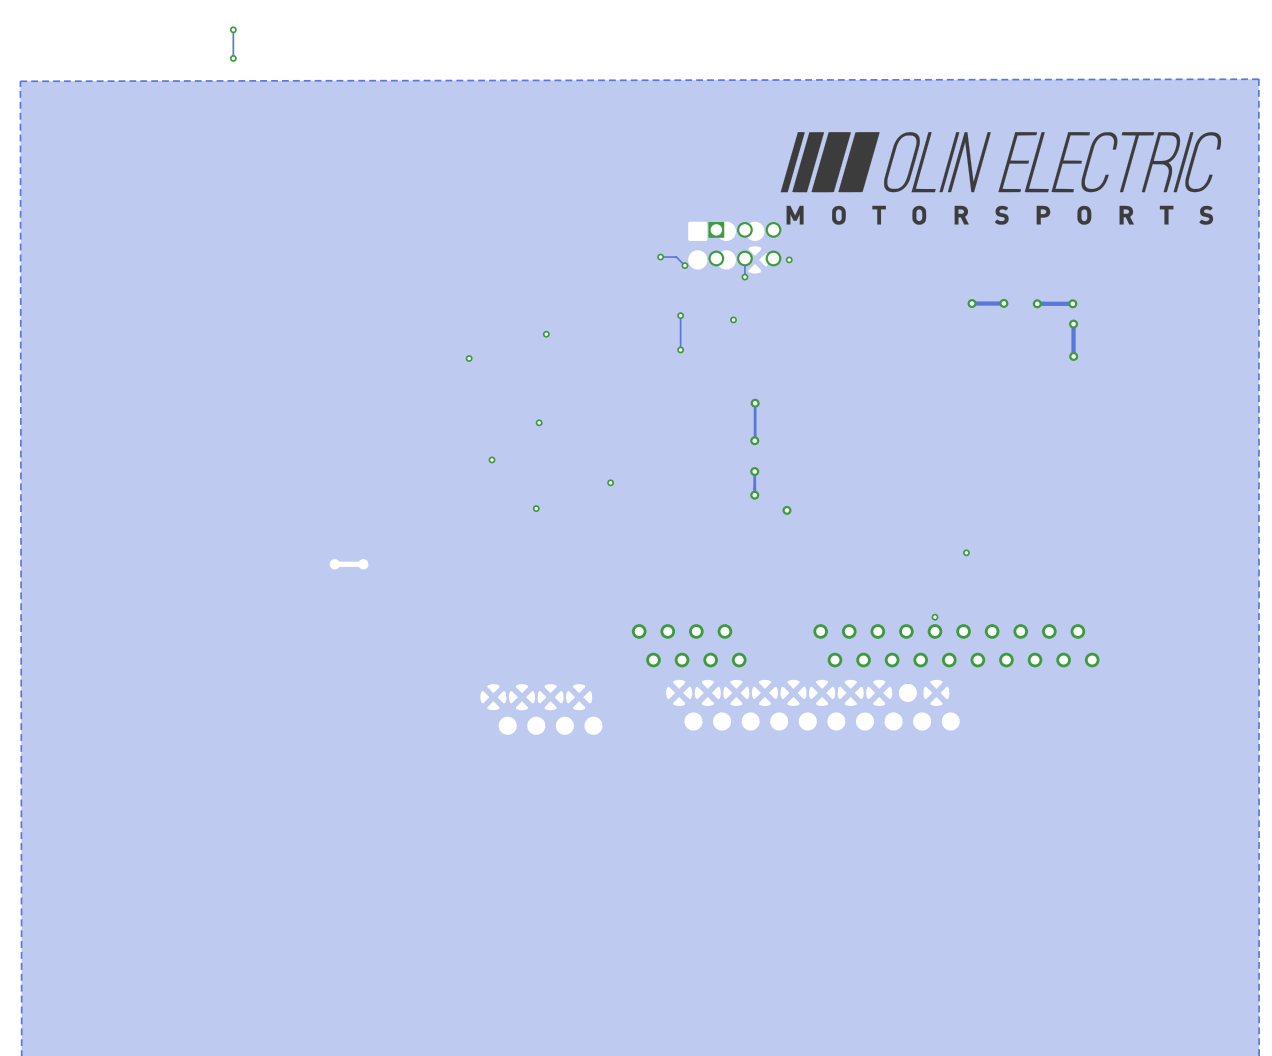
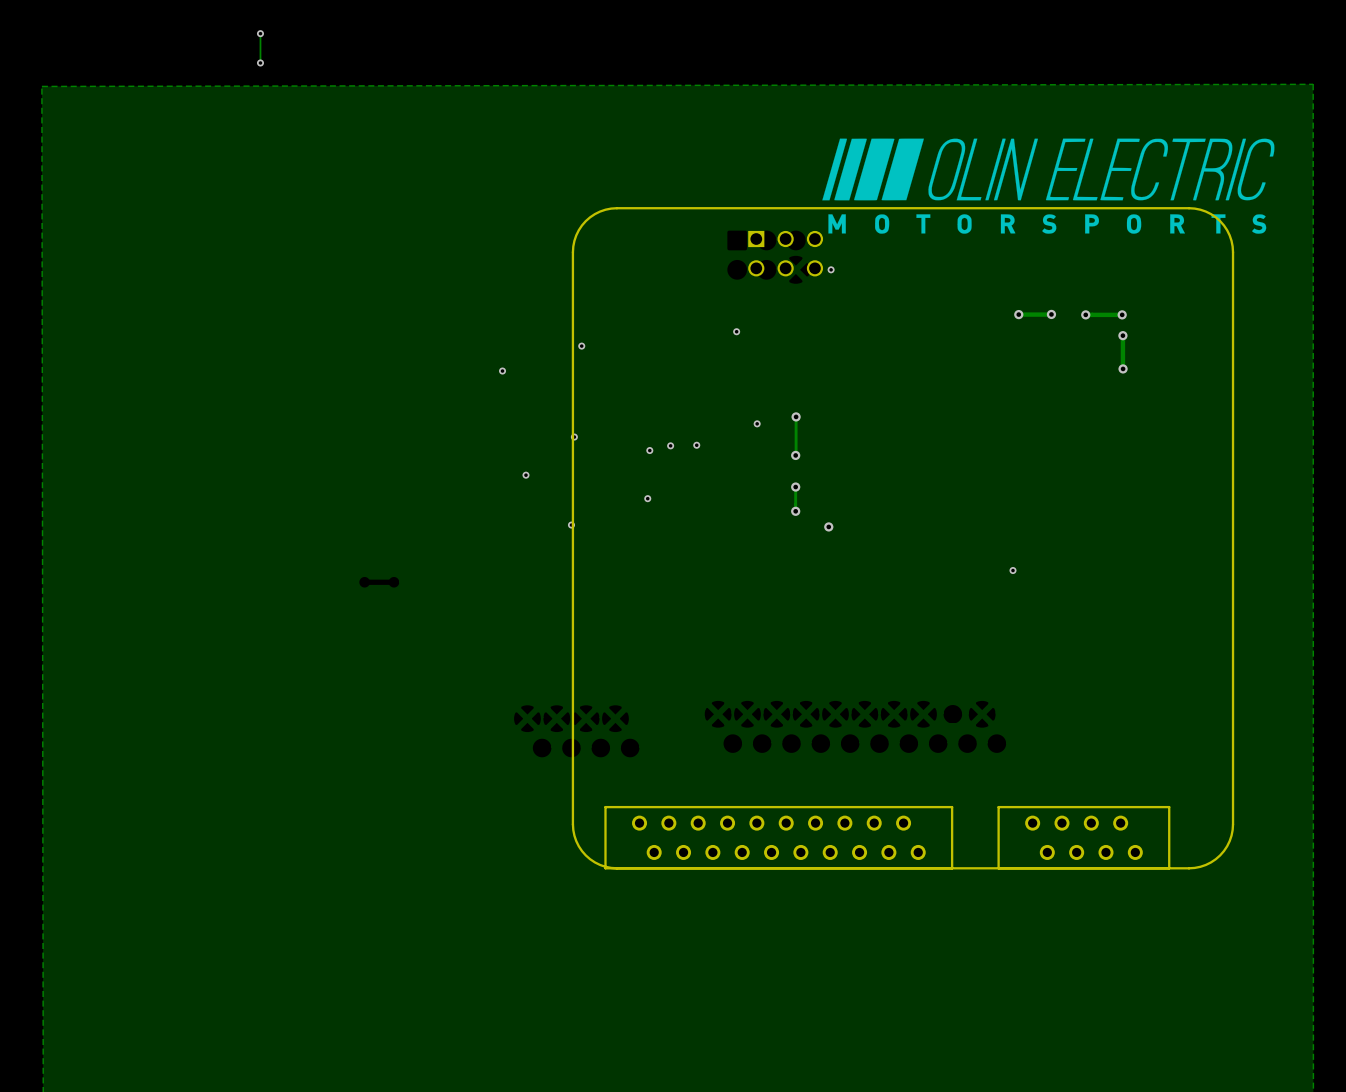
track: (660, 257) (676, 257) (684, 265) -> none
via: (660, 257) -> none
track: (744, 258) (744, 277) -> none
via: (684, 265) -> none
via: (744, 277) -> none
track: (680, 315) (680, 349) -> none
via: (680, 315) -> none
via: (733, 319) -> none
via: none -> (736, 331)
via: (680, 349) -> none
via: none -> (757, 423)
via: none -> (696, 445)
via: none -> (670, 445)
via: none -> (649, 450)
via: (934, 617) -> none
part: (689, 645) -> none
part position: (956, 645) -> (778, 837)
part: none -> (1083, 837)
board edge: none -> (1169, 868) (1169, 807) (998, 807) (998, 868)
board edge: none -> (1189, 868) (1205, 864) (1220, 855) (1229, 841) (1233, 824) (1233, 252) (1229, 235) (1223, 225) (1205, 211) (1189, 208) (616, 208) (600, 211) (585, 221) (576, 235) (572, 252) (573, 830) (578, 846) (585, 855) (600, 864) (616, 868)
board edge: none -> (1189, 868) (605, 868) (605, 807) (952, 807) (952, 868)

